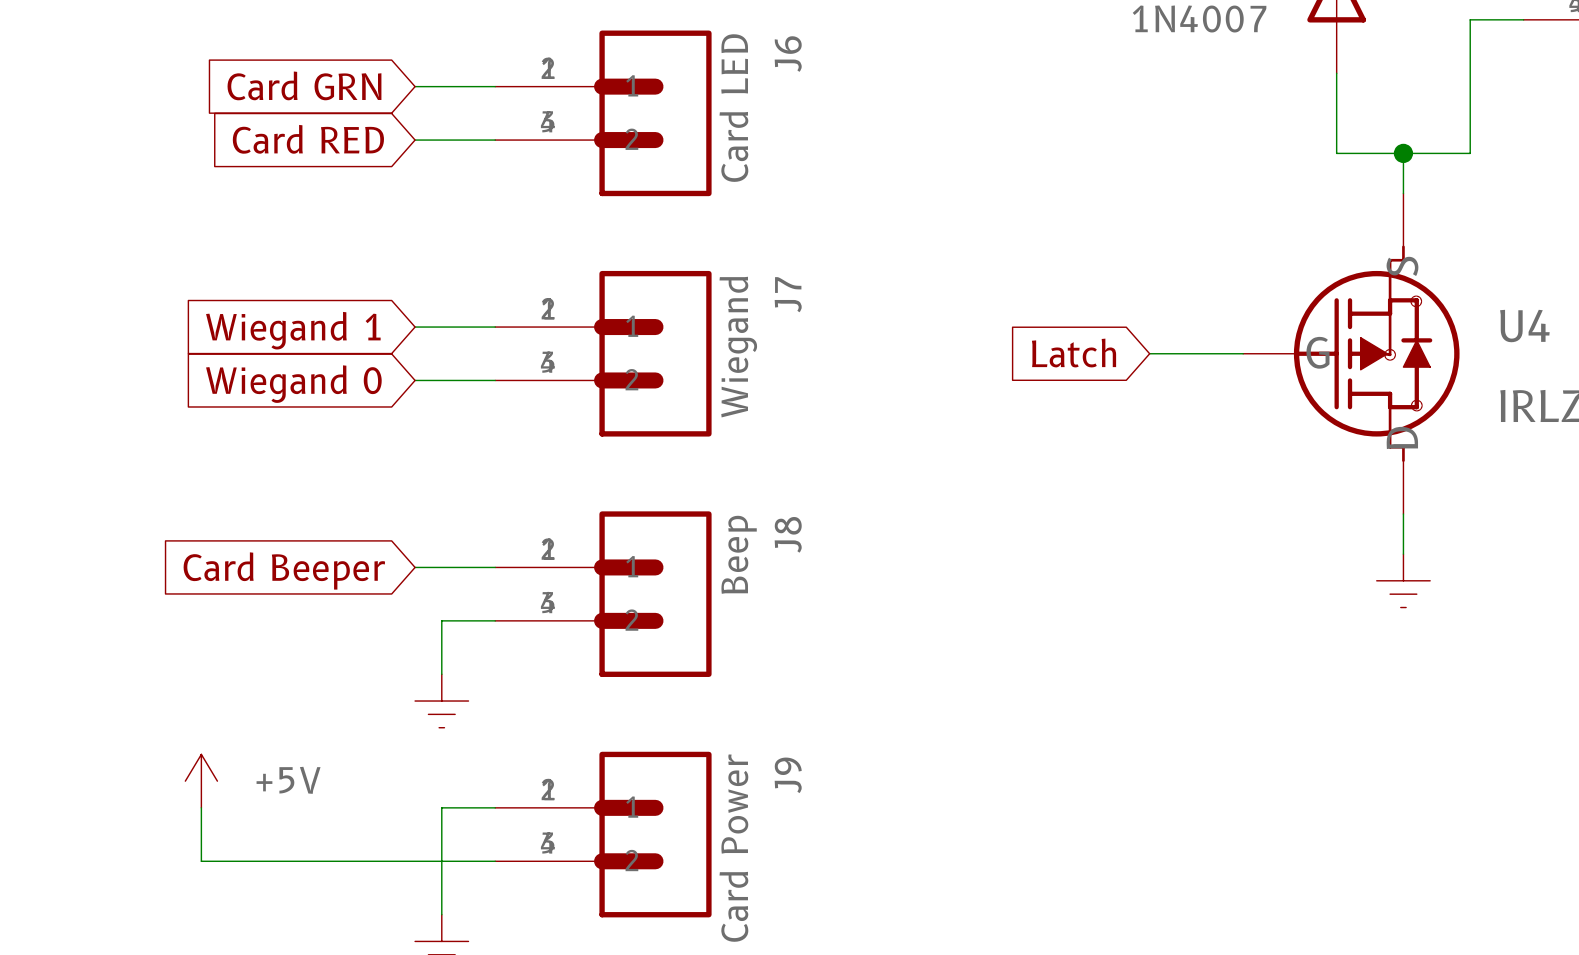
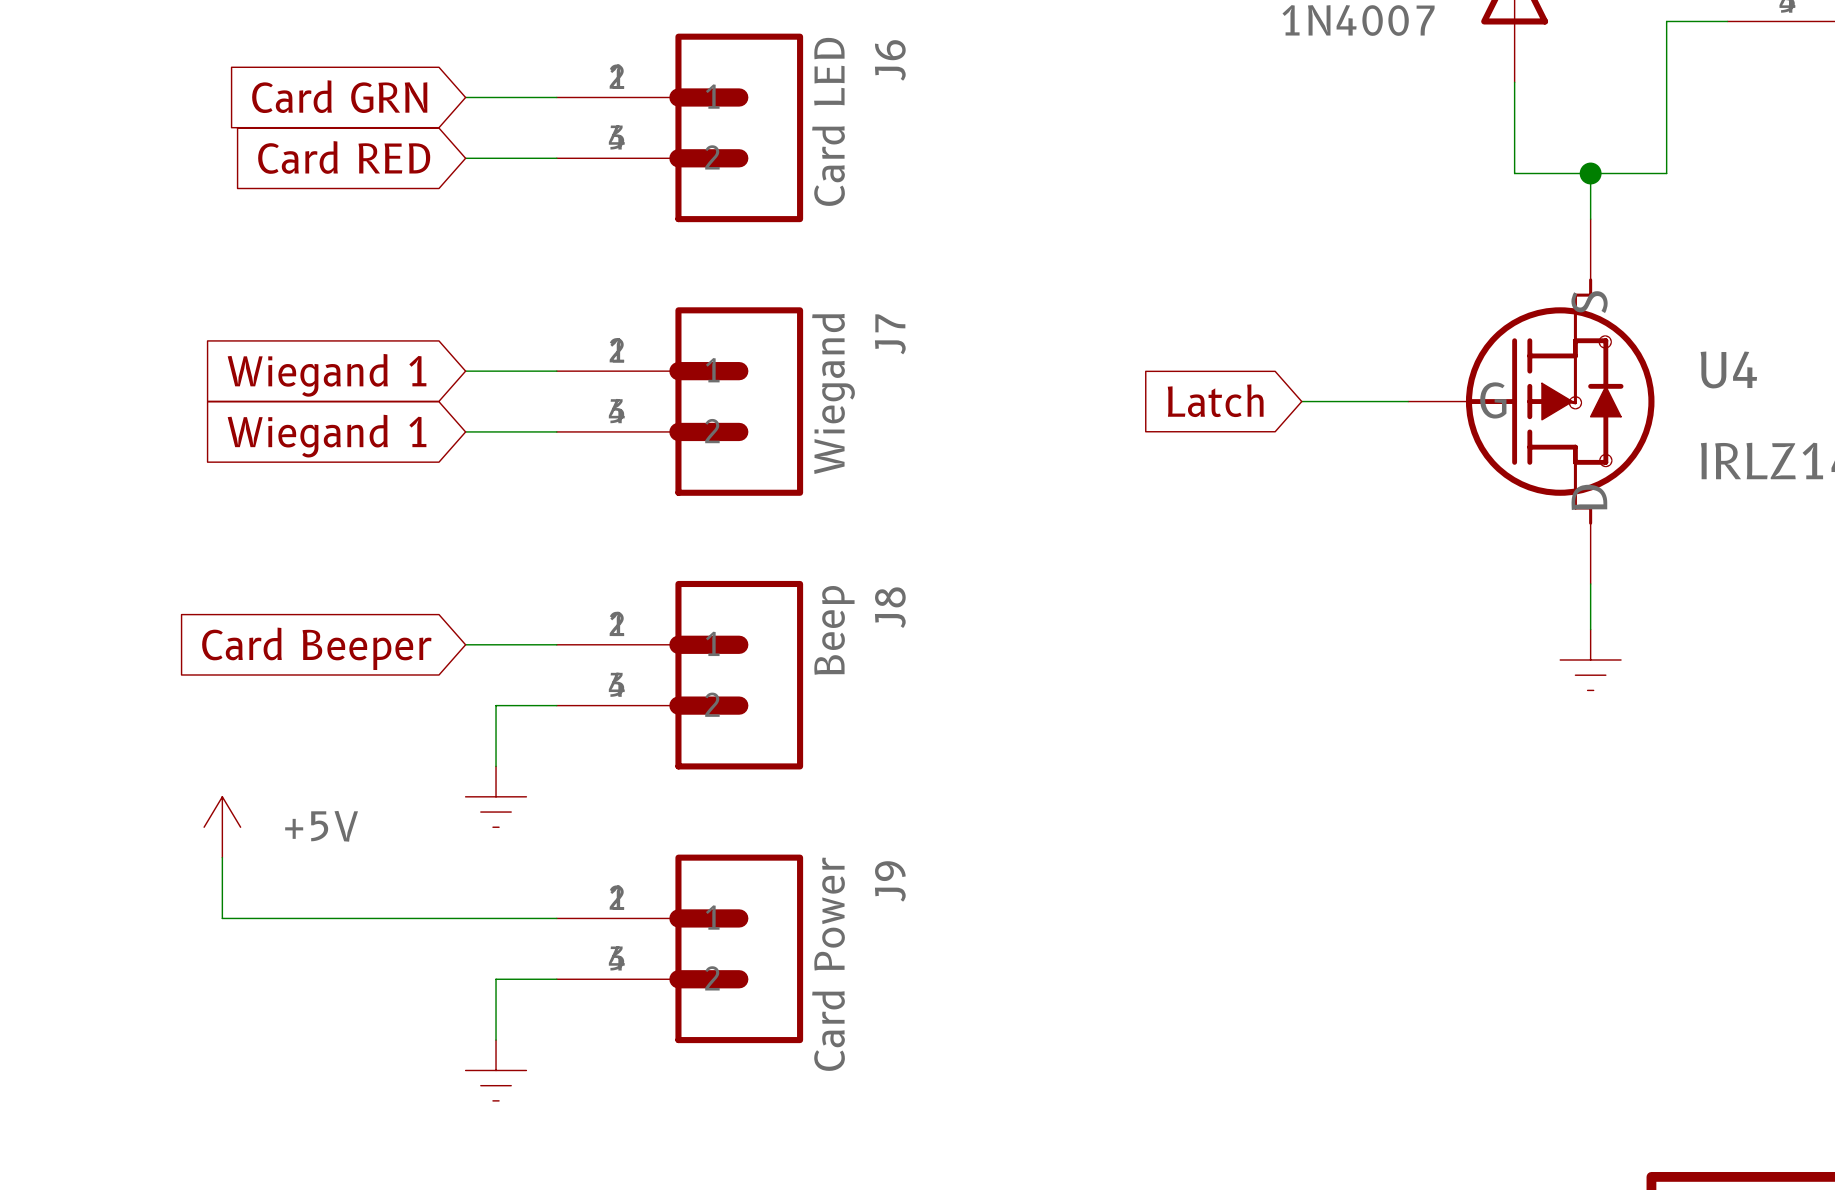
global label: Wiegand 0 (293, 384) -> Wiegand 1 (327, 436)
power symbol position: +5V (201, 781) -> +5V (222, 827)
wire: (201, 807) (201, 861) (441, 861) (441, 807) -> (222, 857) (222, 918) (496, 918)

